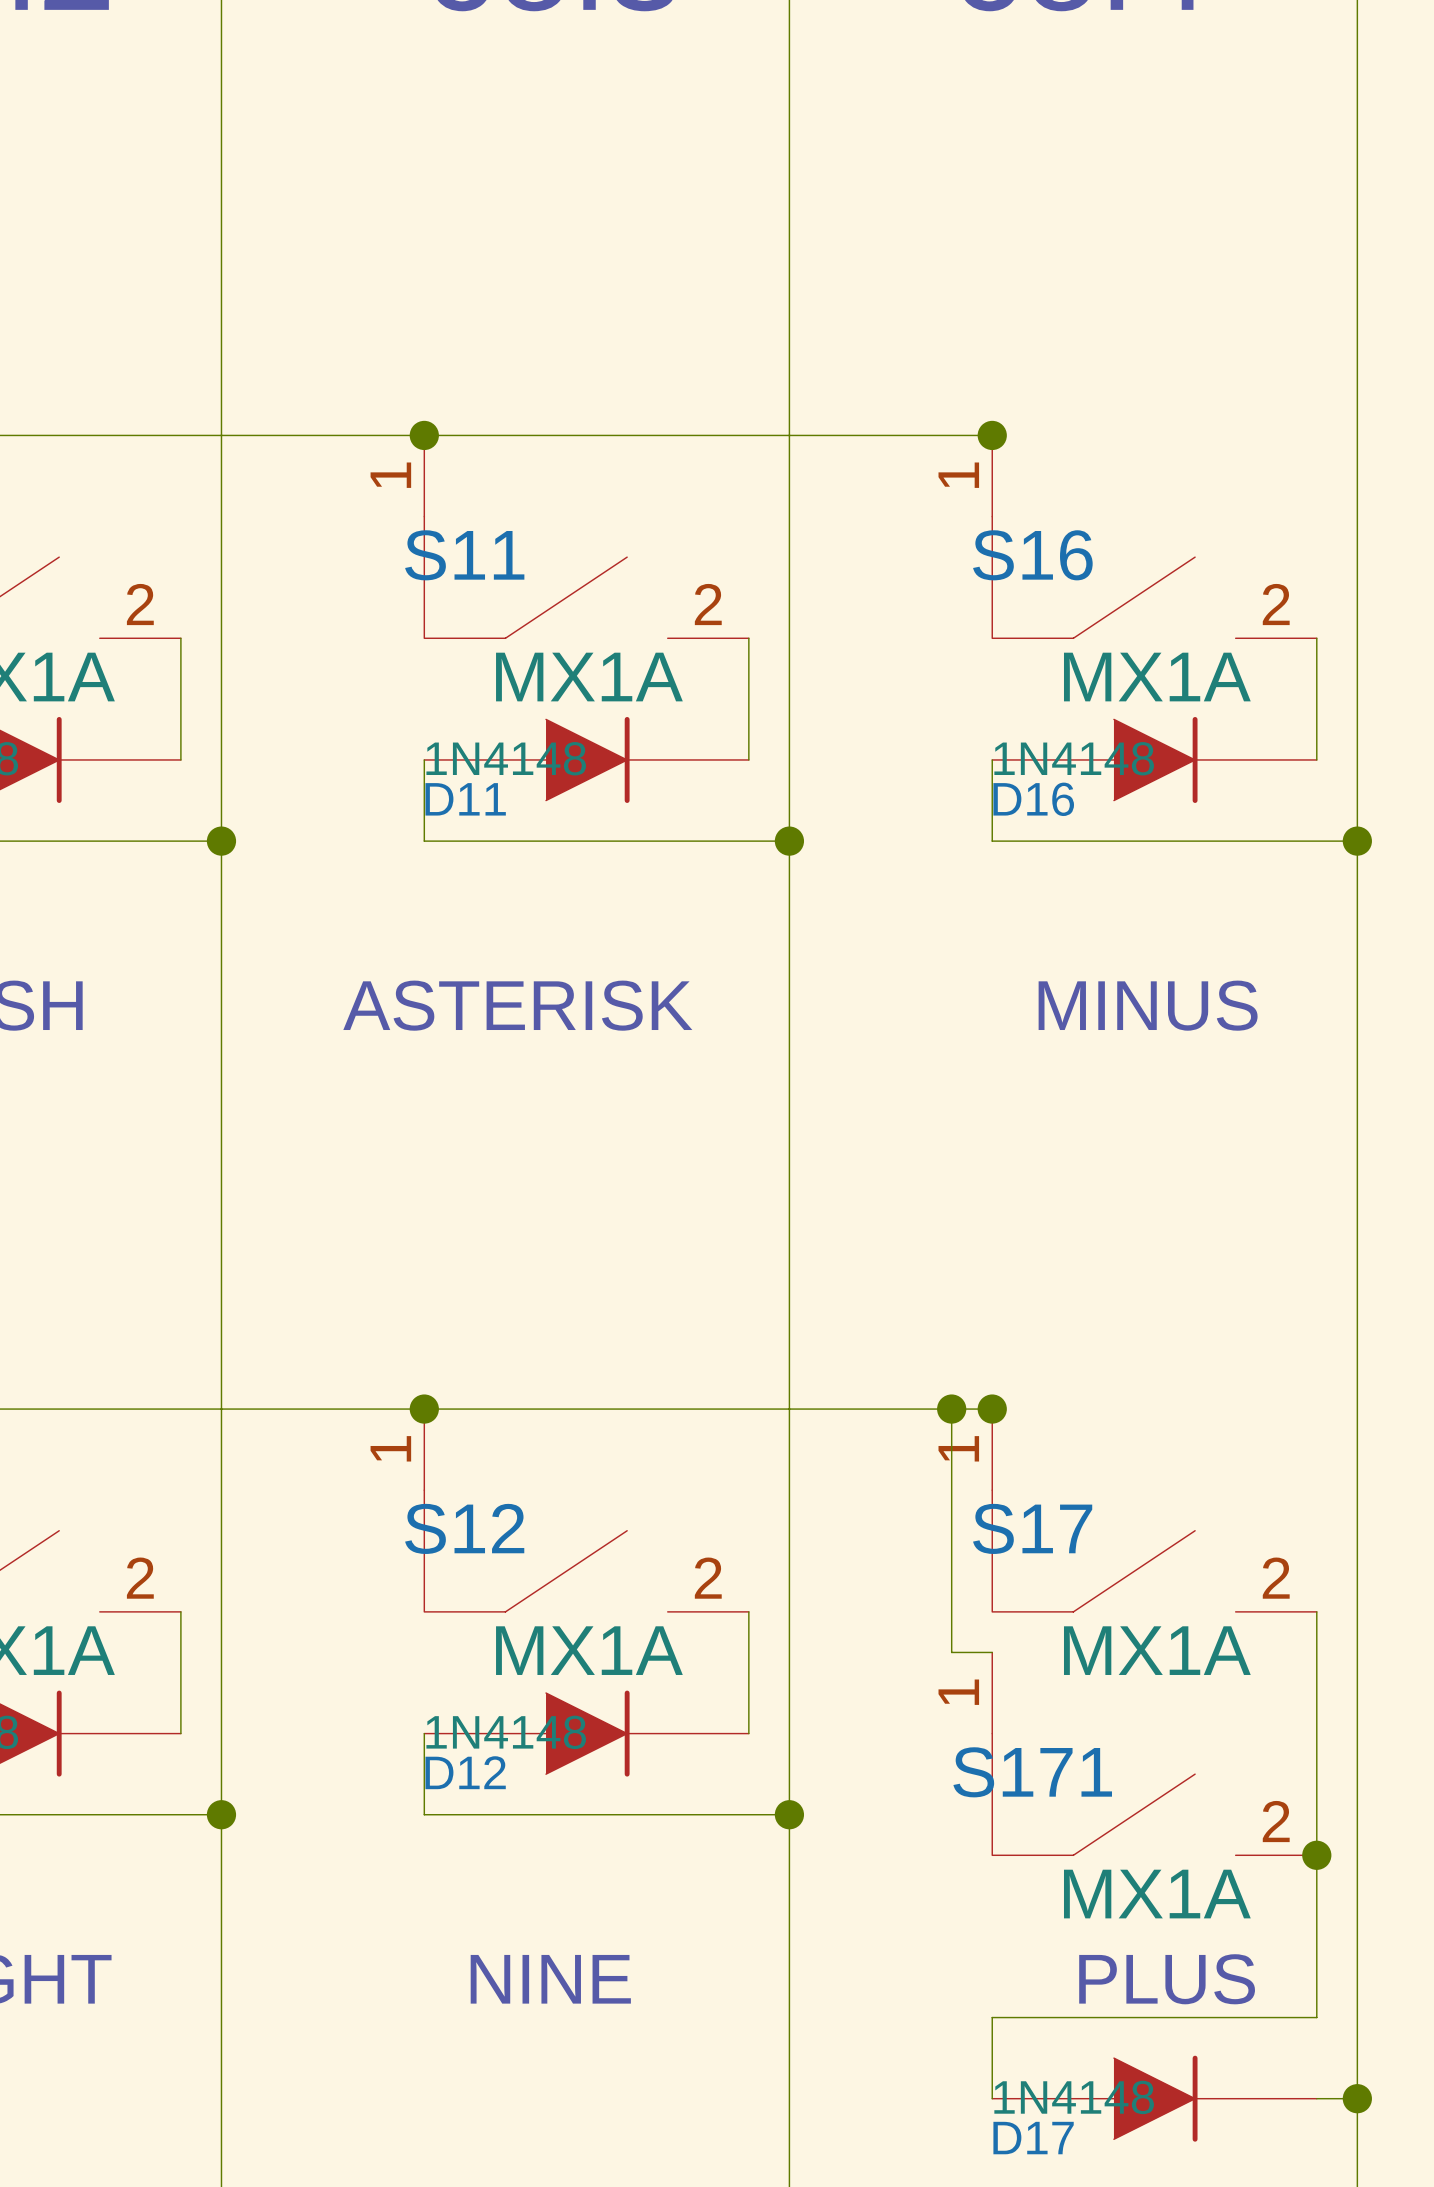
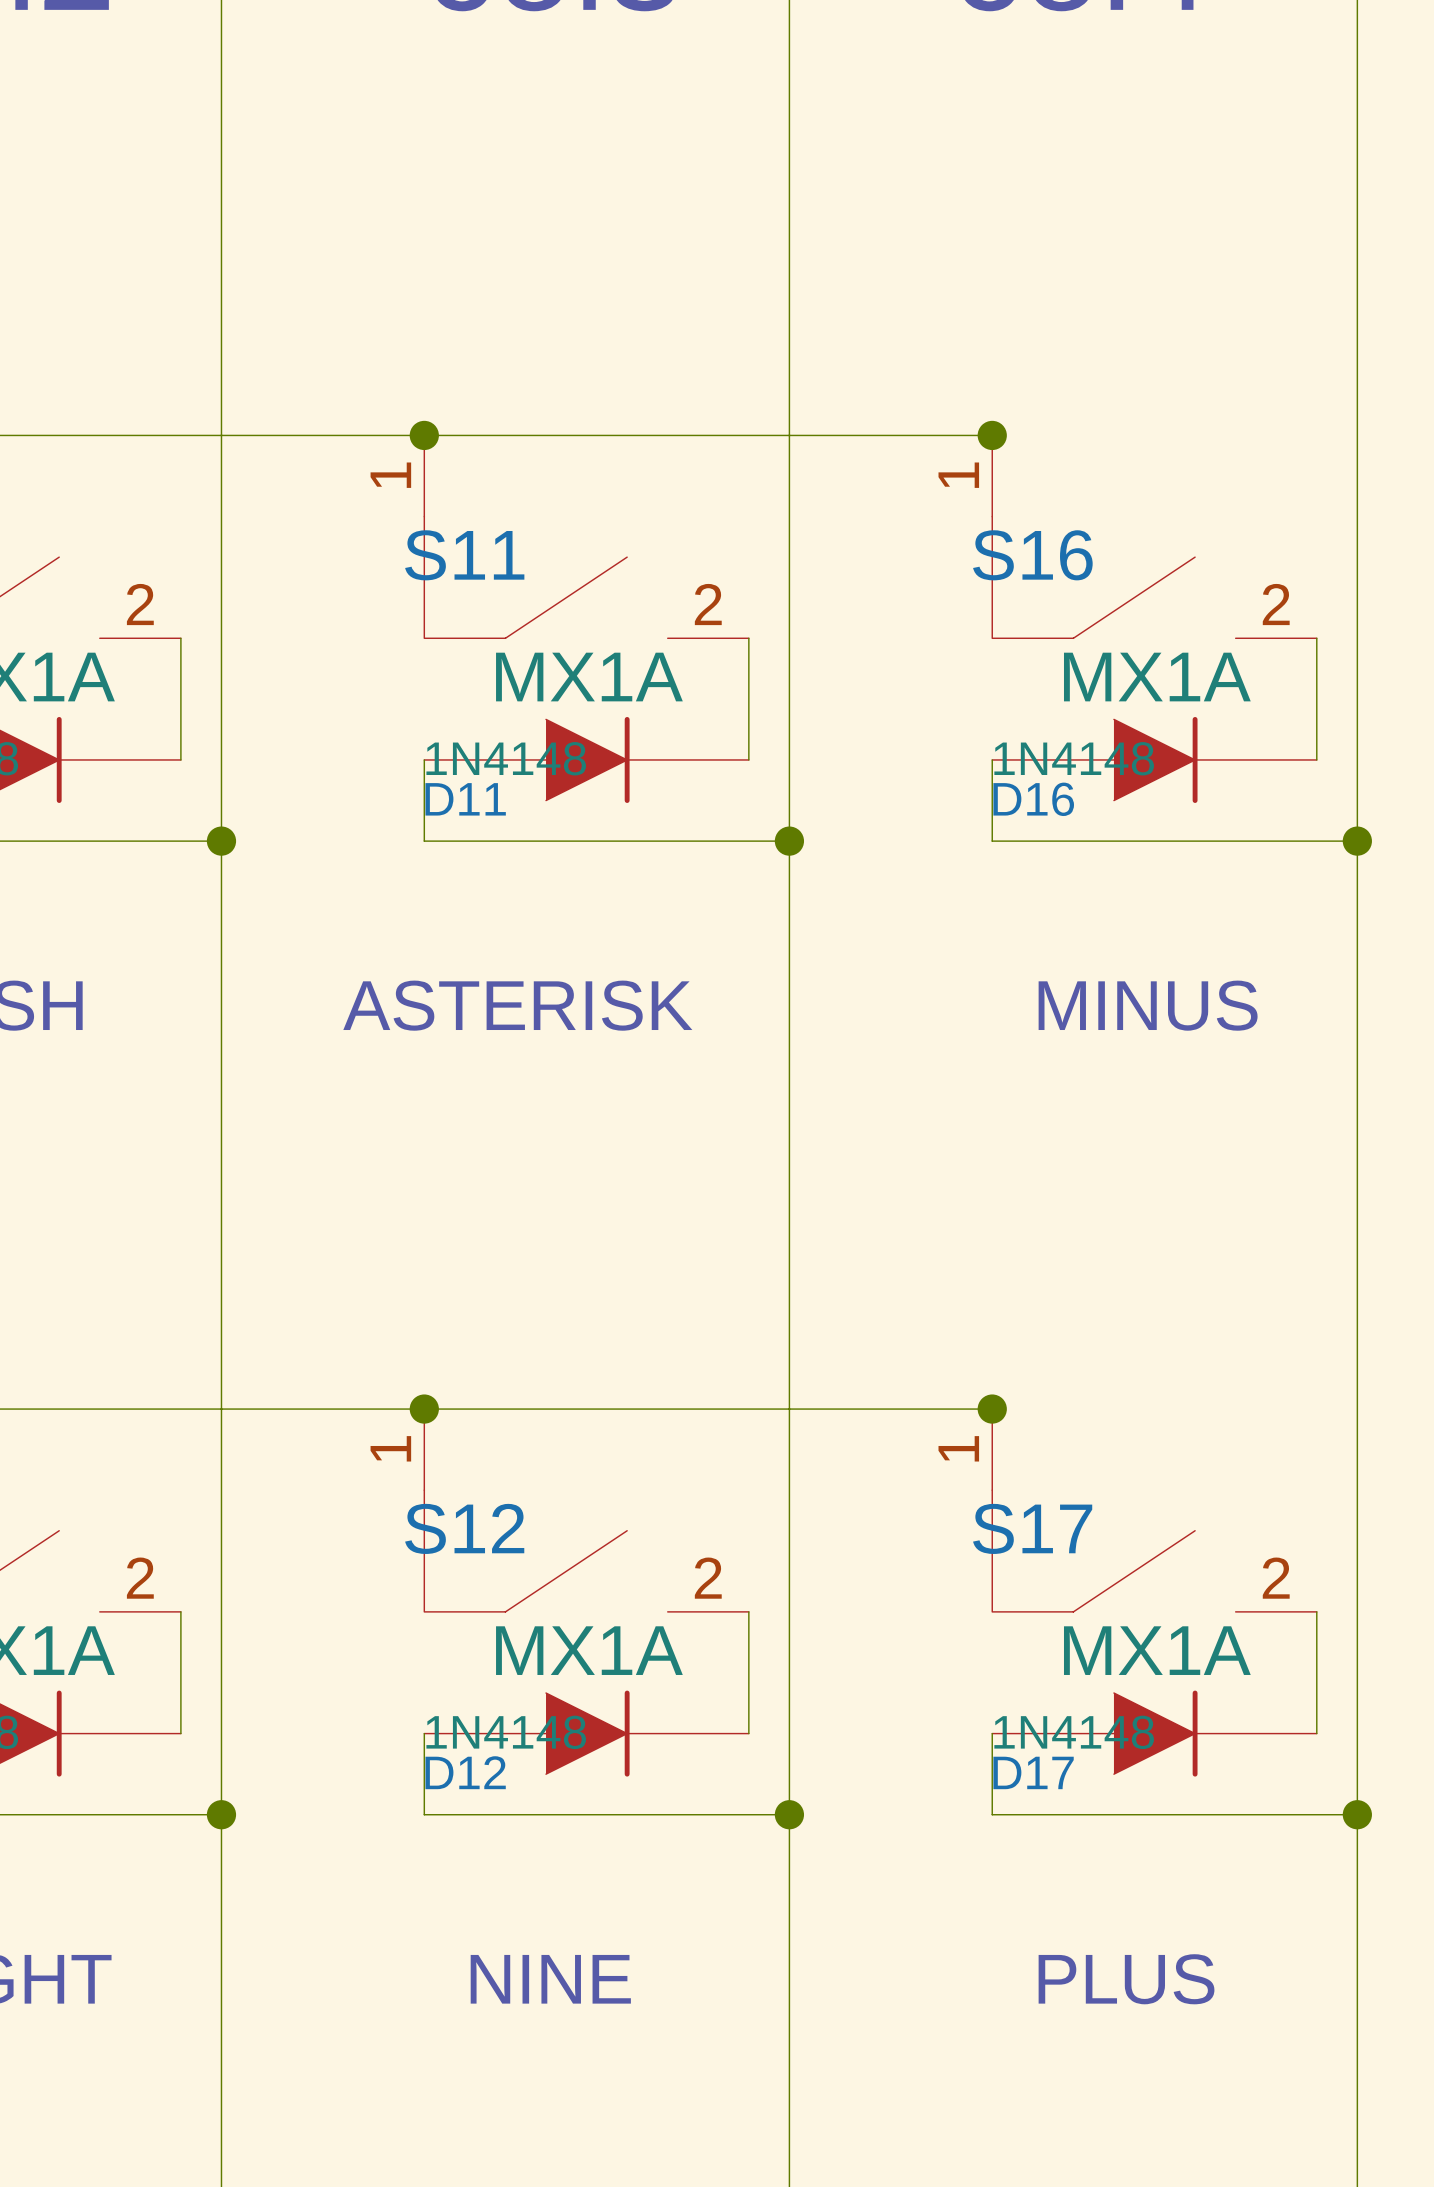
wire: (951, 1409) (951, 1652) (992, 1652) -> none
junction: (951, 1409) -> none
wire: none -> (992, 1733) (992, 1814) (1357, 1814)
wire: (1316, 1733) (1316, 2017) (992, 2017) (992, 2098) -> none
S171: MX1A (1154, 1753) -> none
junction position: (1316, 1855) -> (1357, 1814)
text position: PLUS (1167, 1979) -> PLUS (1126, 1979)
D17 position: (1154, 2098) -> (1154, 1733)
wire: (1316, 2098) (1357, 2098) -> none
junction: (1357, 2098) -> none

